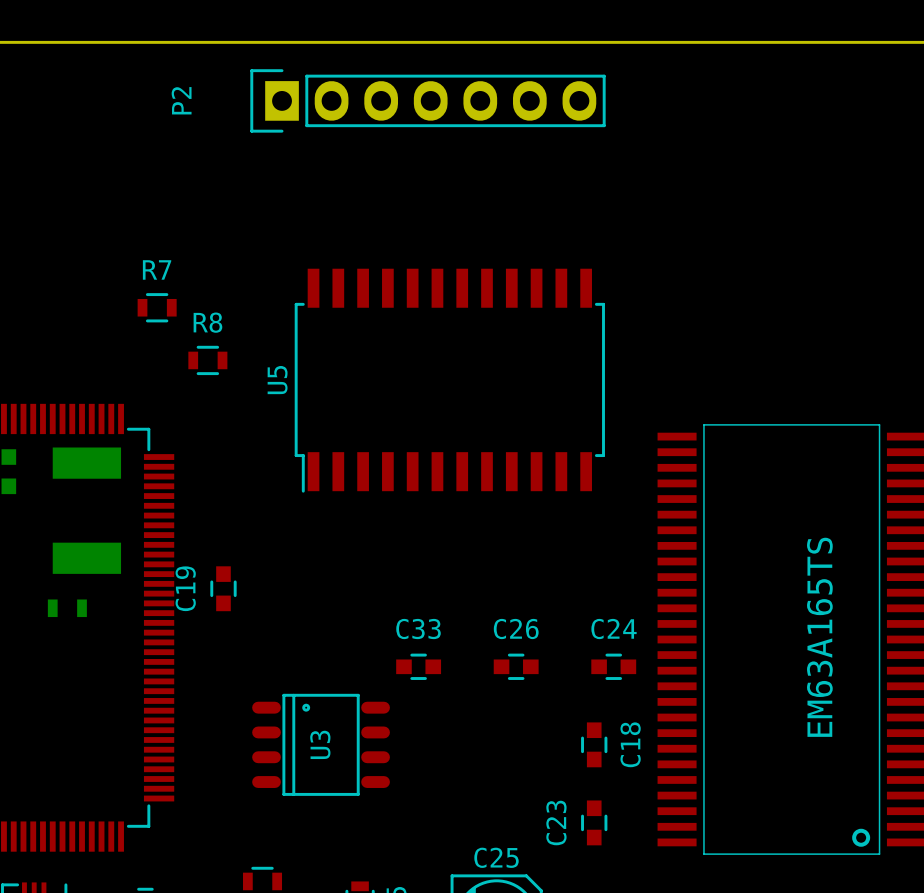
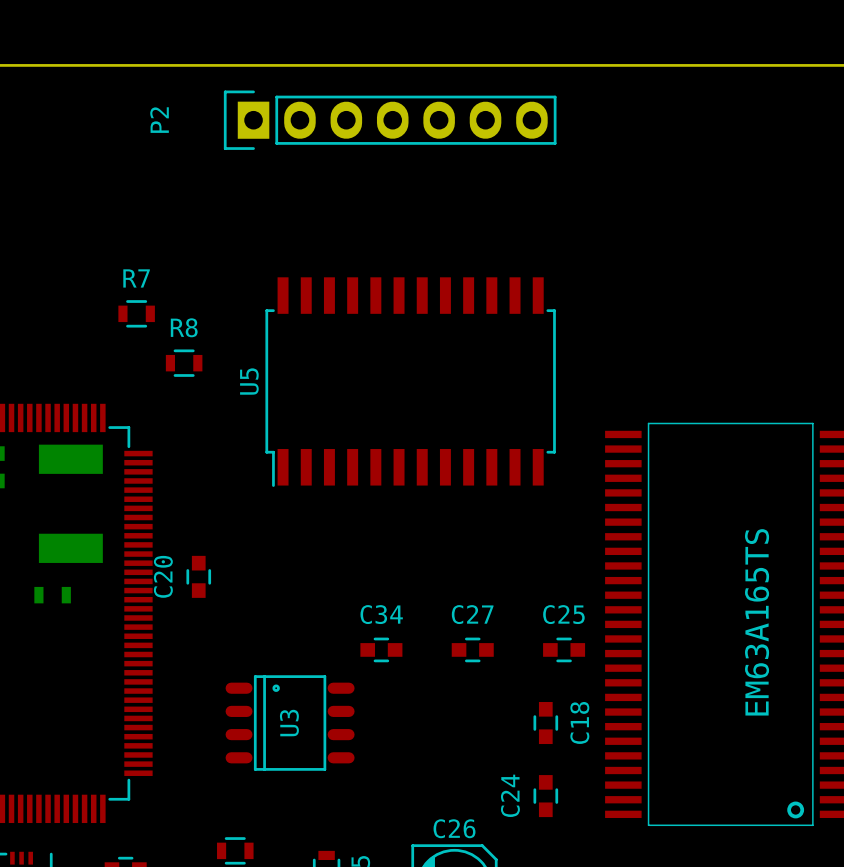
C19 name: C19 (185, 588) -> C20 (163, 576)
C33 name: C33 (418, 629) -> C34 (381, 614)
C26 name: C26 (516, 629) -> C27 (472, 614)
C24 name: C24 (614, 629) -> C25 (563, 614)
C23 name: C23 (556, 823) -> C24 (510, 795)
C25 name: C25 (496, 857) -> C26 (454, 828)

